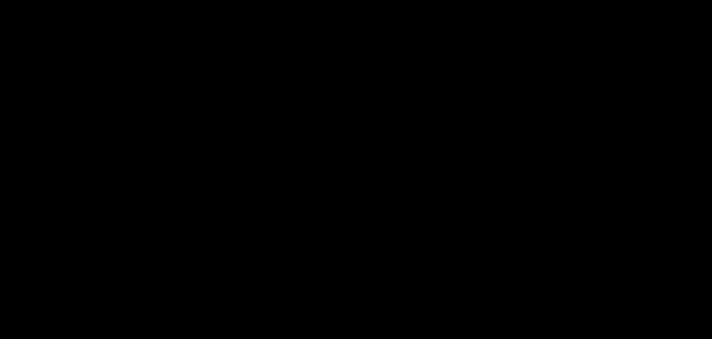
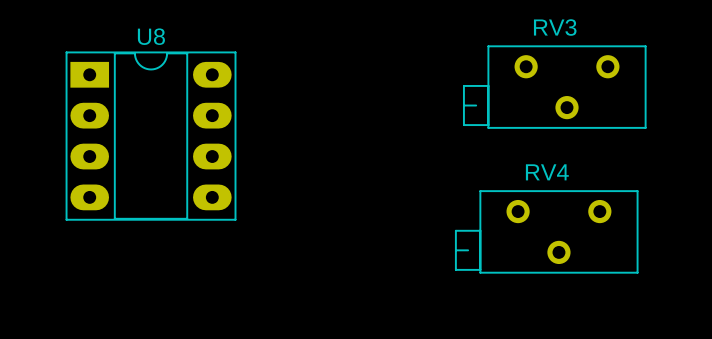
RV3: none -> (554, 87)
U8: none -> (151, 136)
RV4: none -> (546, 231)

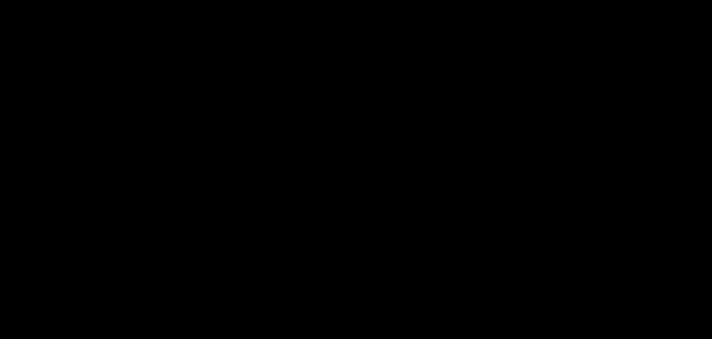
RV3: (554, 87) -> none
U8: (151, 136) -> none
RV4: (546, 231) -> none

